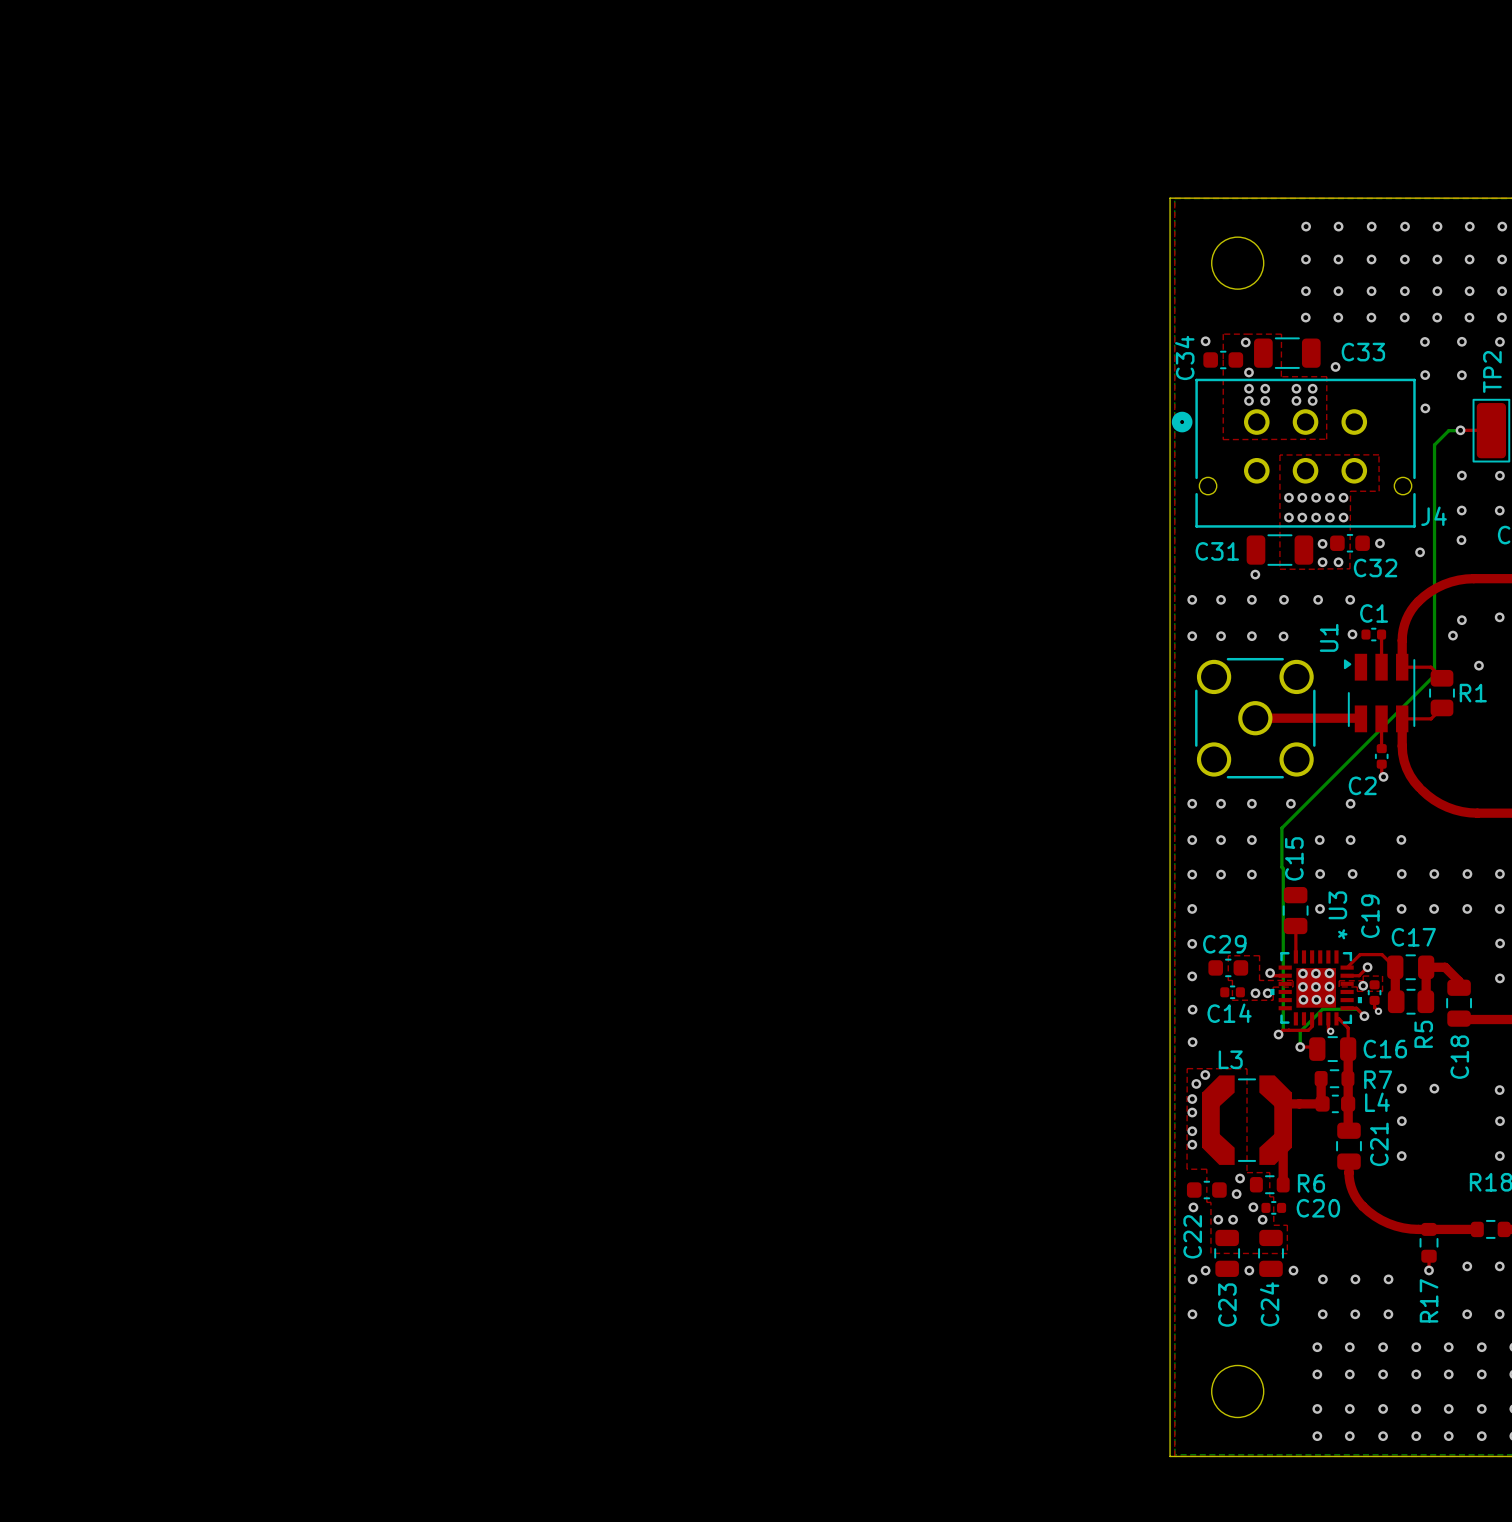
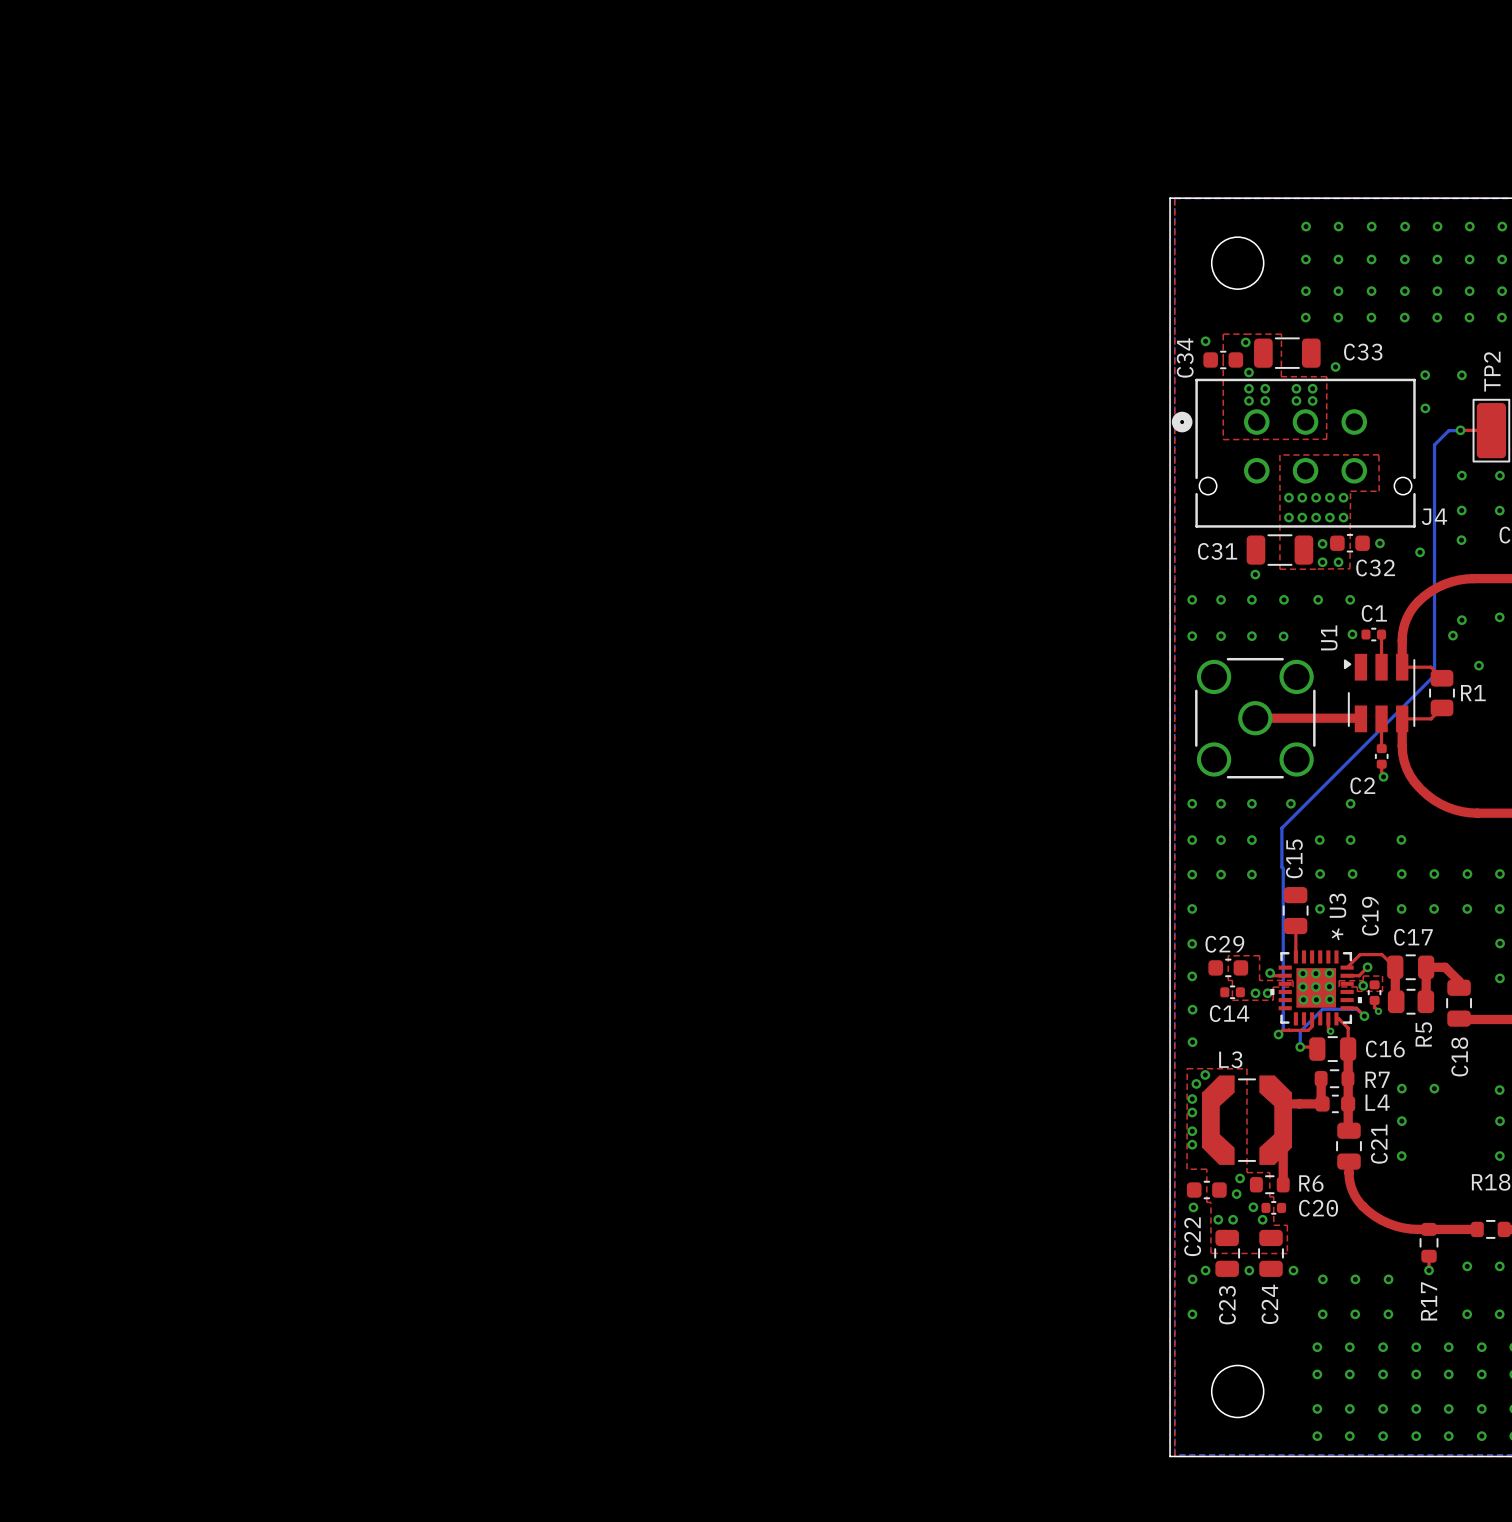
via: (1424, 341) -> none
via: (1461, 341) -> none
via: (1499, 341) -> none

